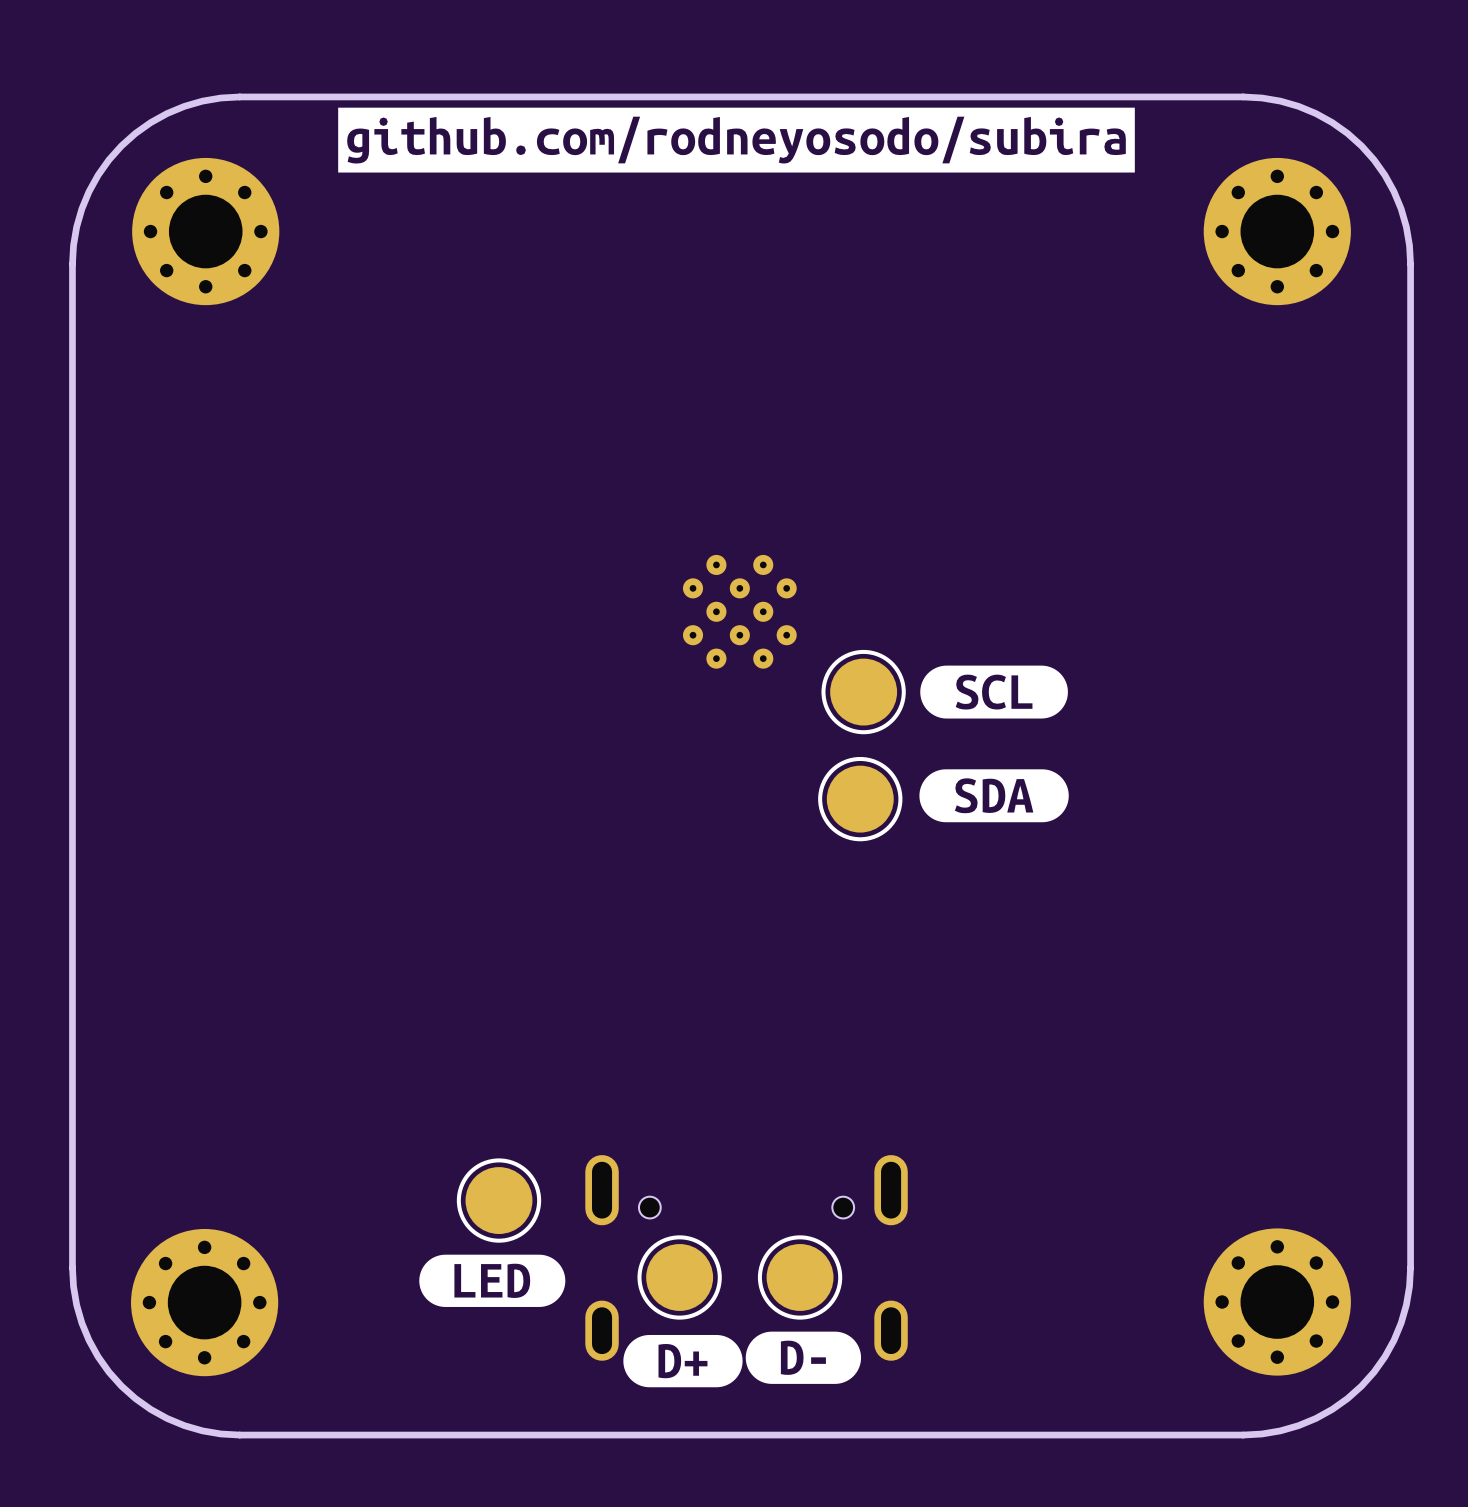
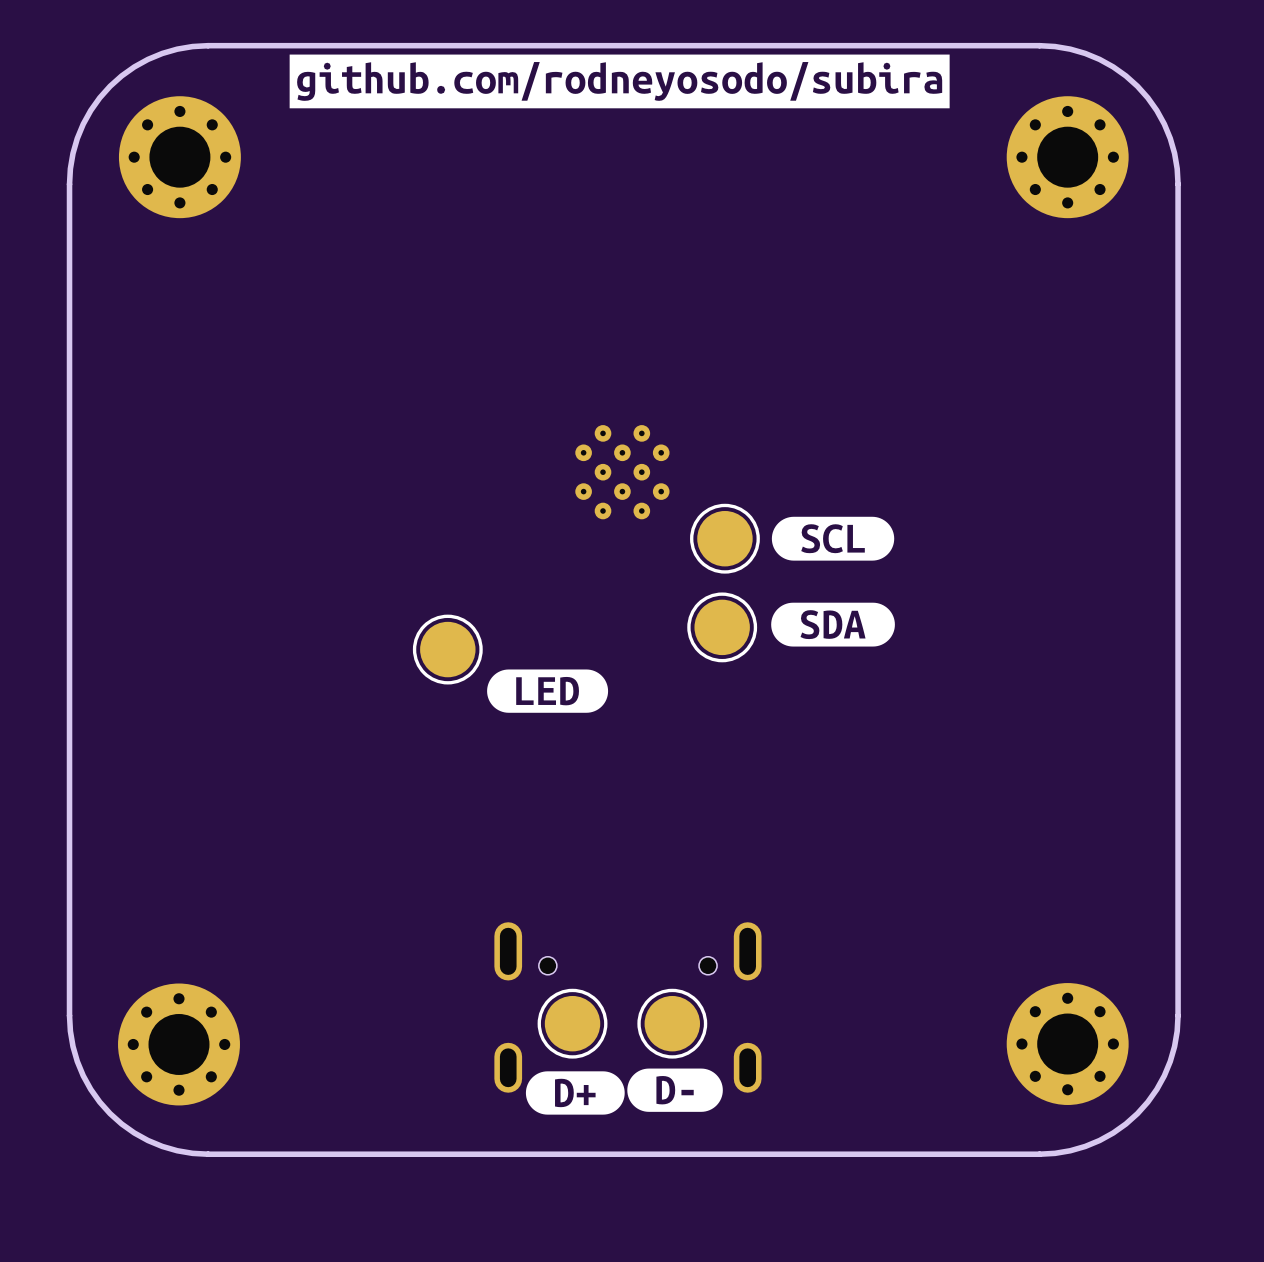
part position: (498, 1200) -> (447, 649)
drawing position: (492, 1280) -> (547, 691)

